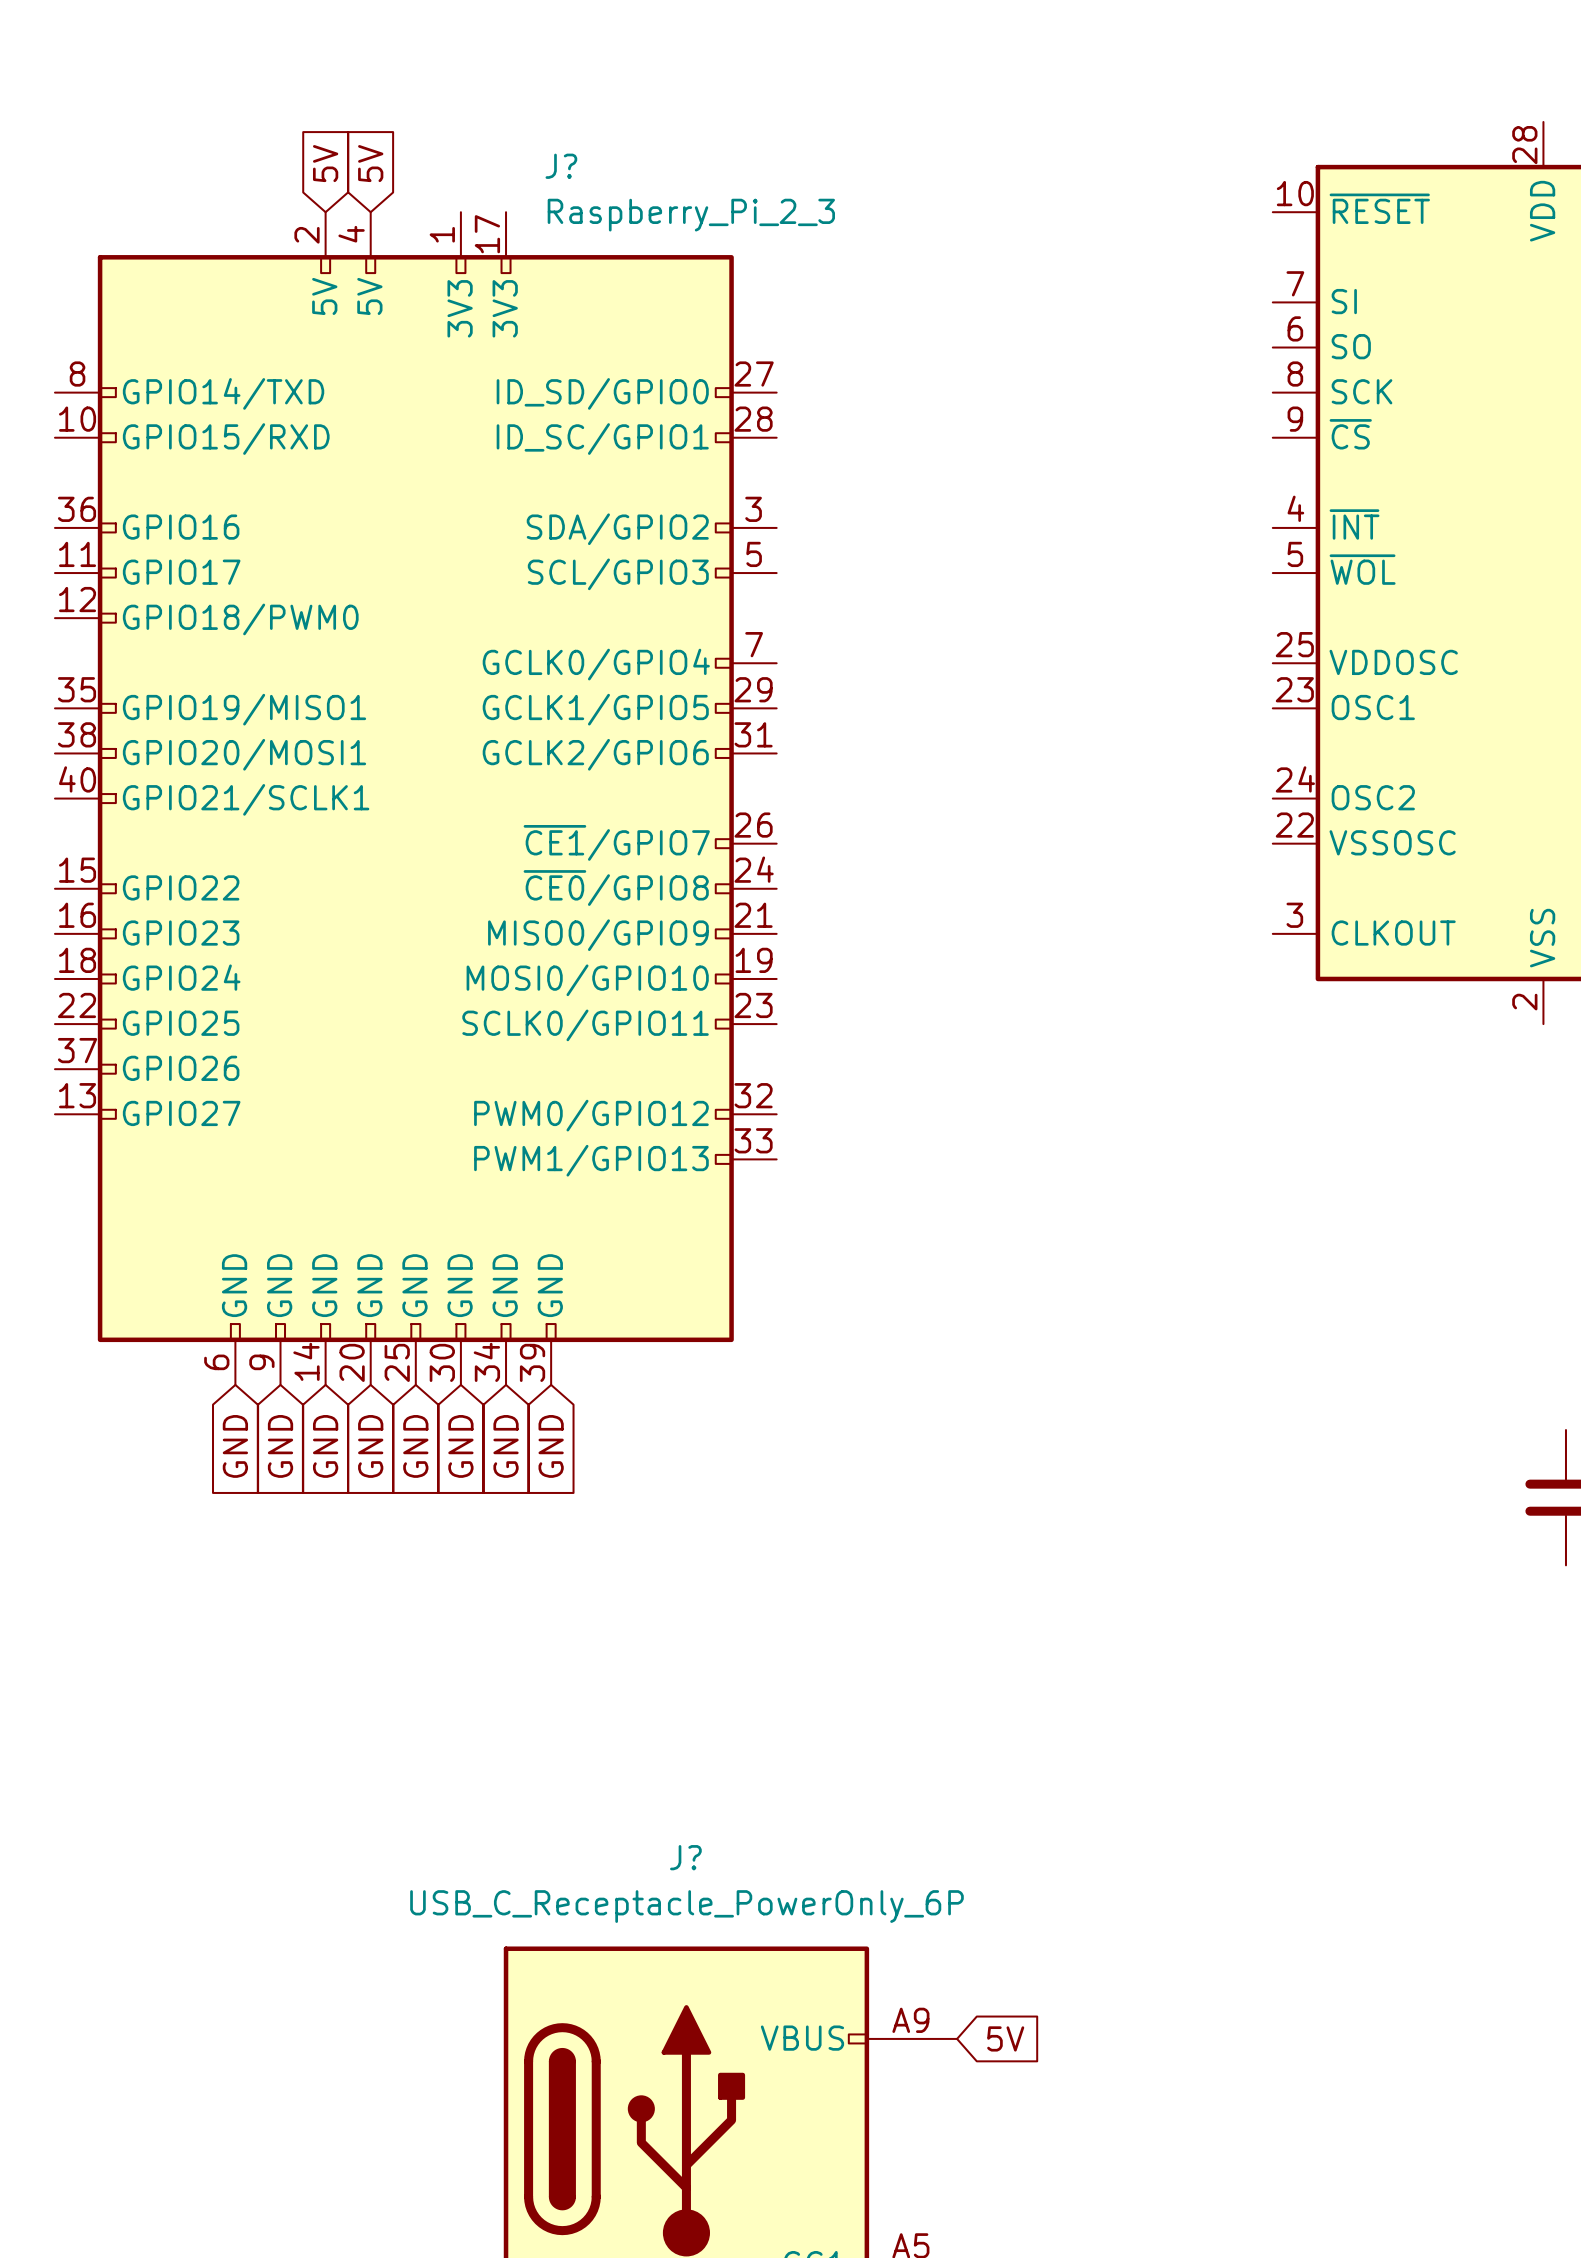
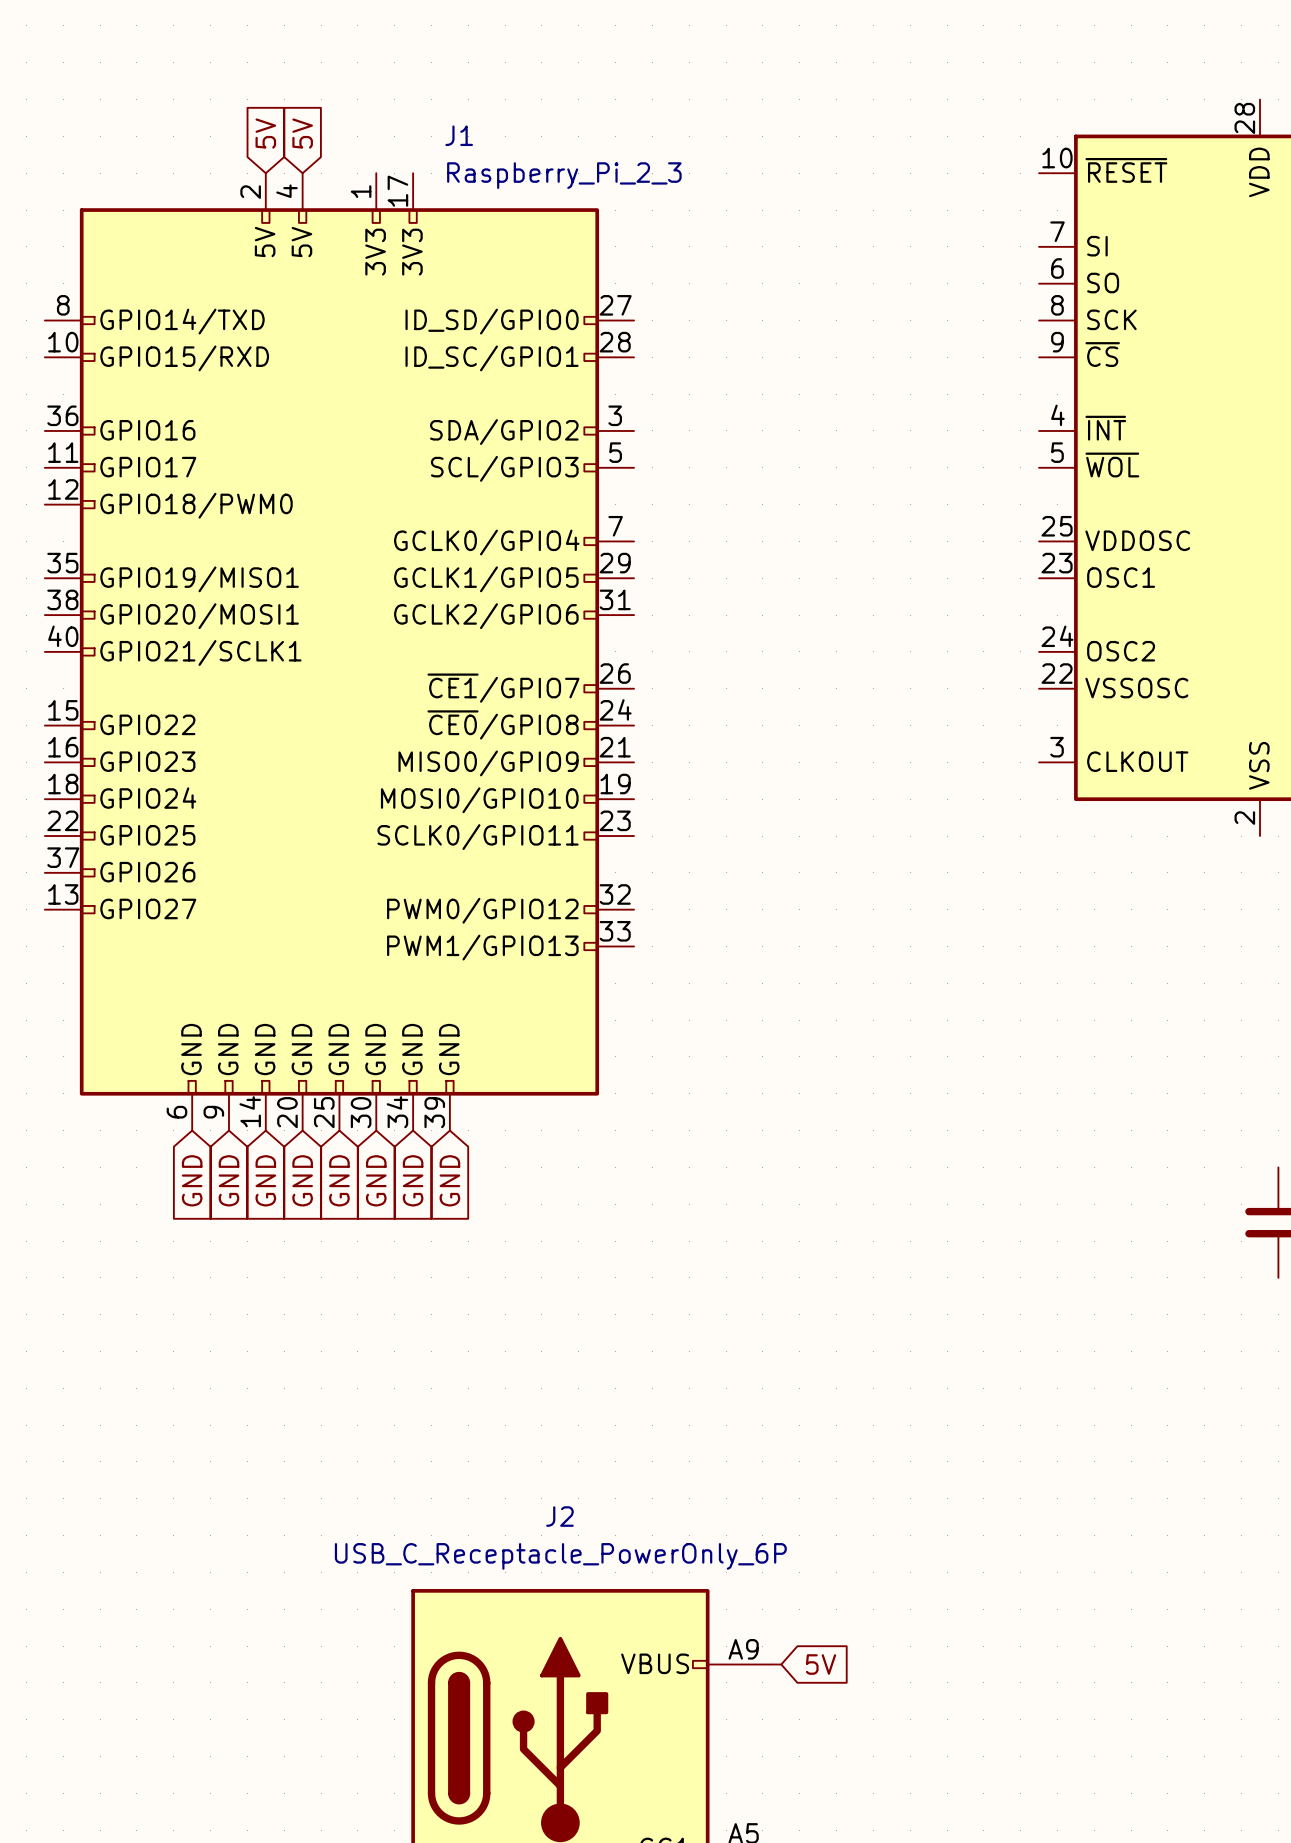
J? name: J? (561, 166) -> J1 (459, 135)
J? name: J? (685, 1857) -> J2 (559, 1516)

